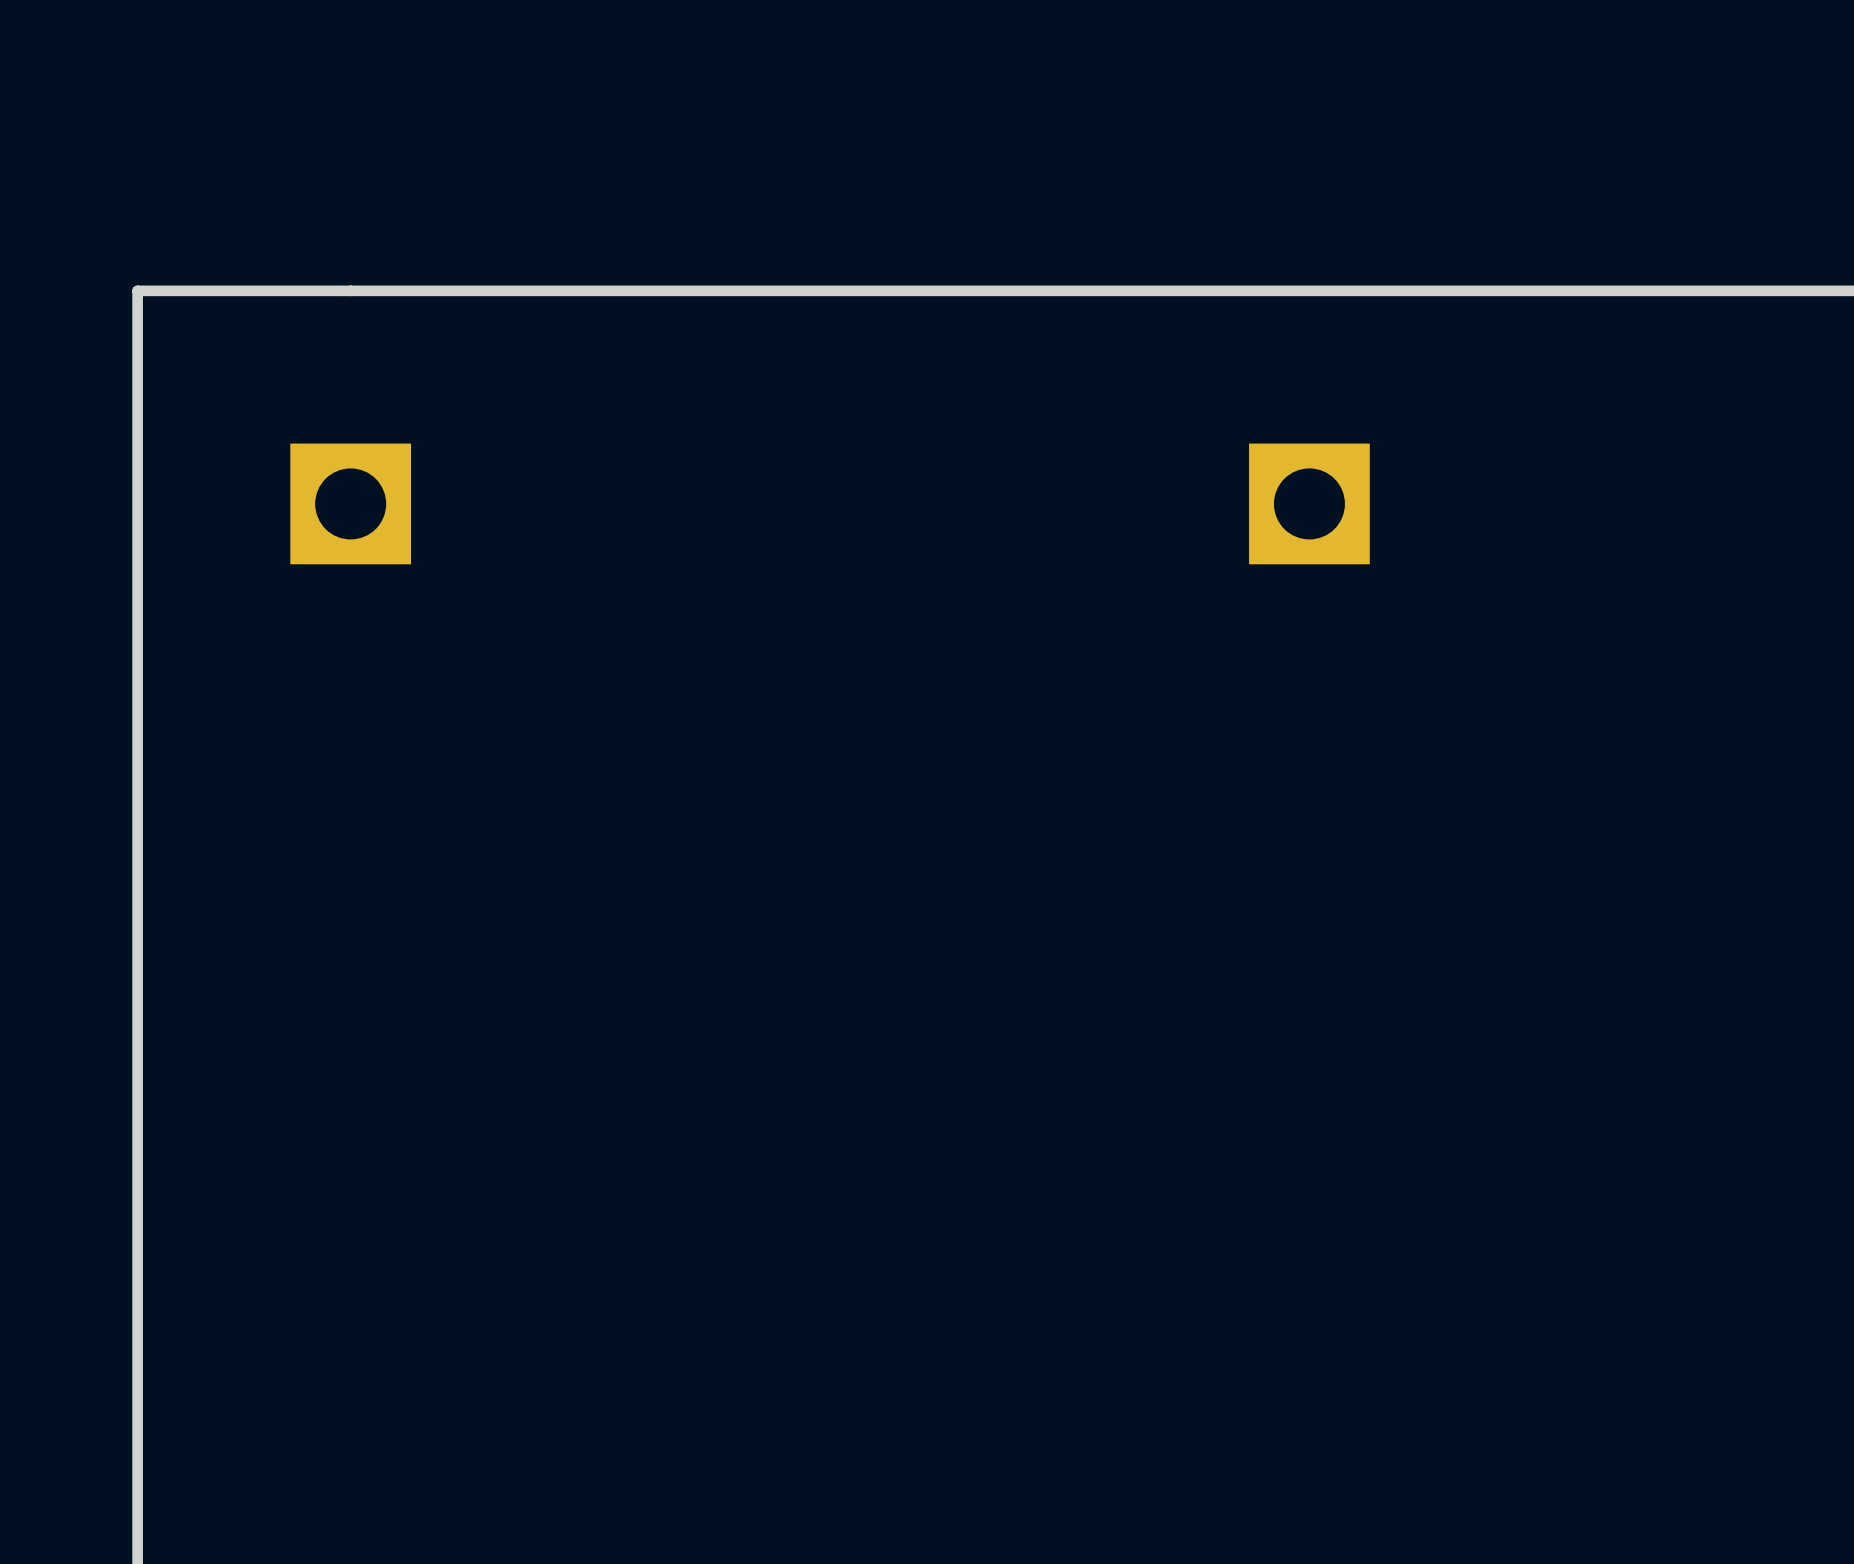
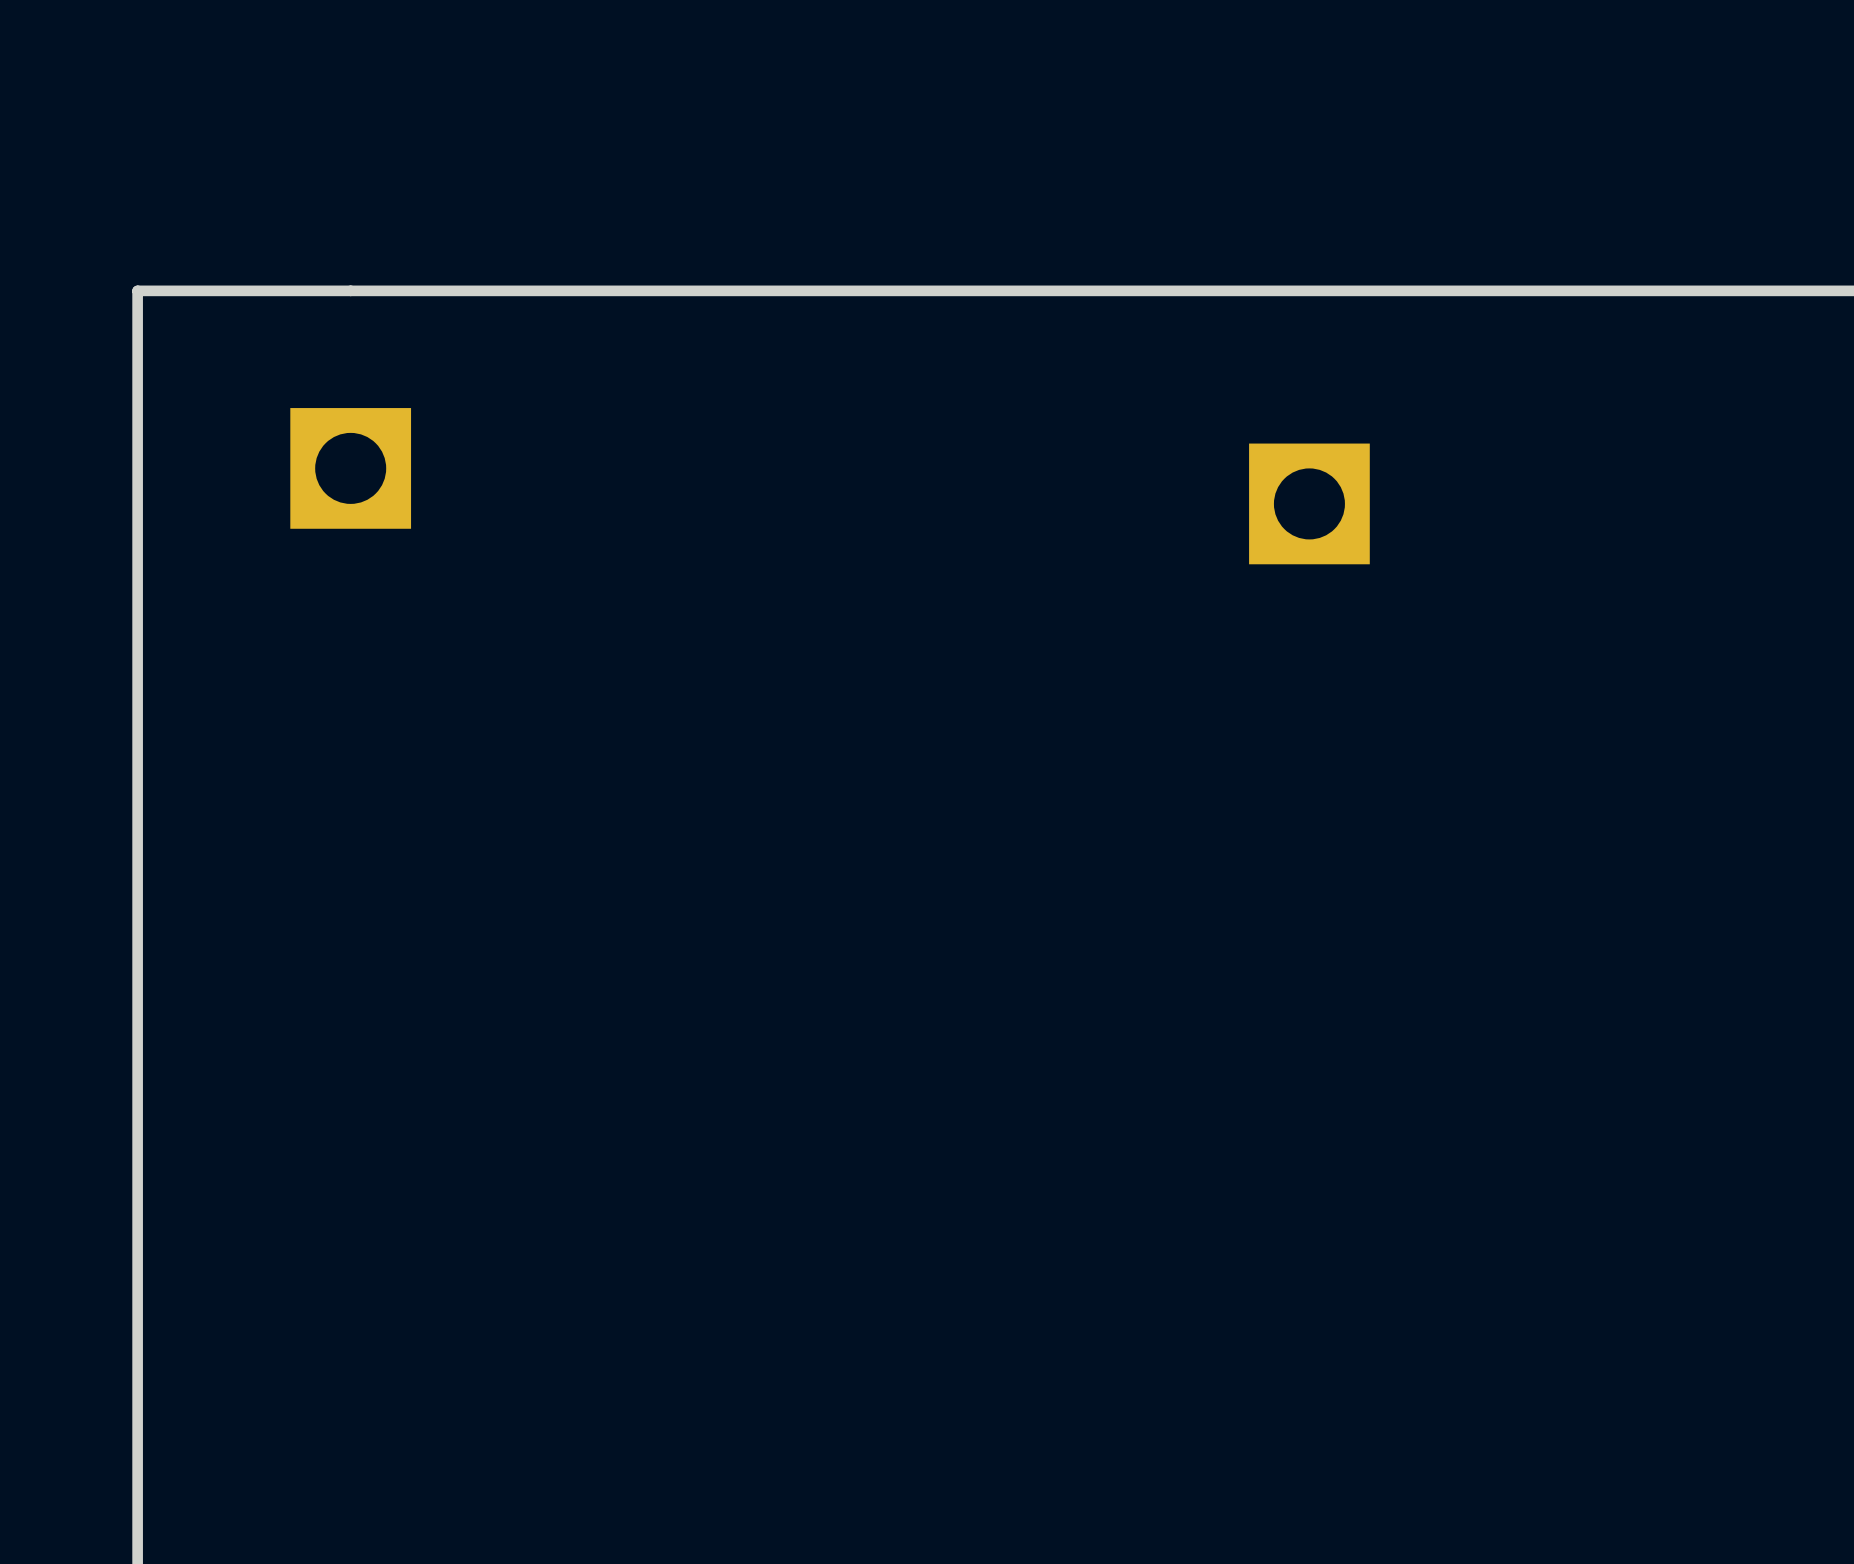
part position: (350, 503) -> (350, 468)

